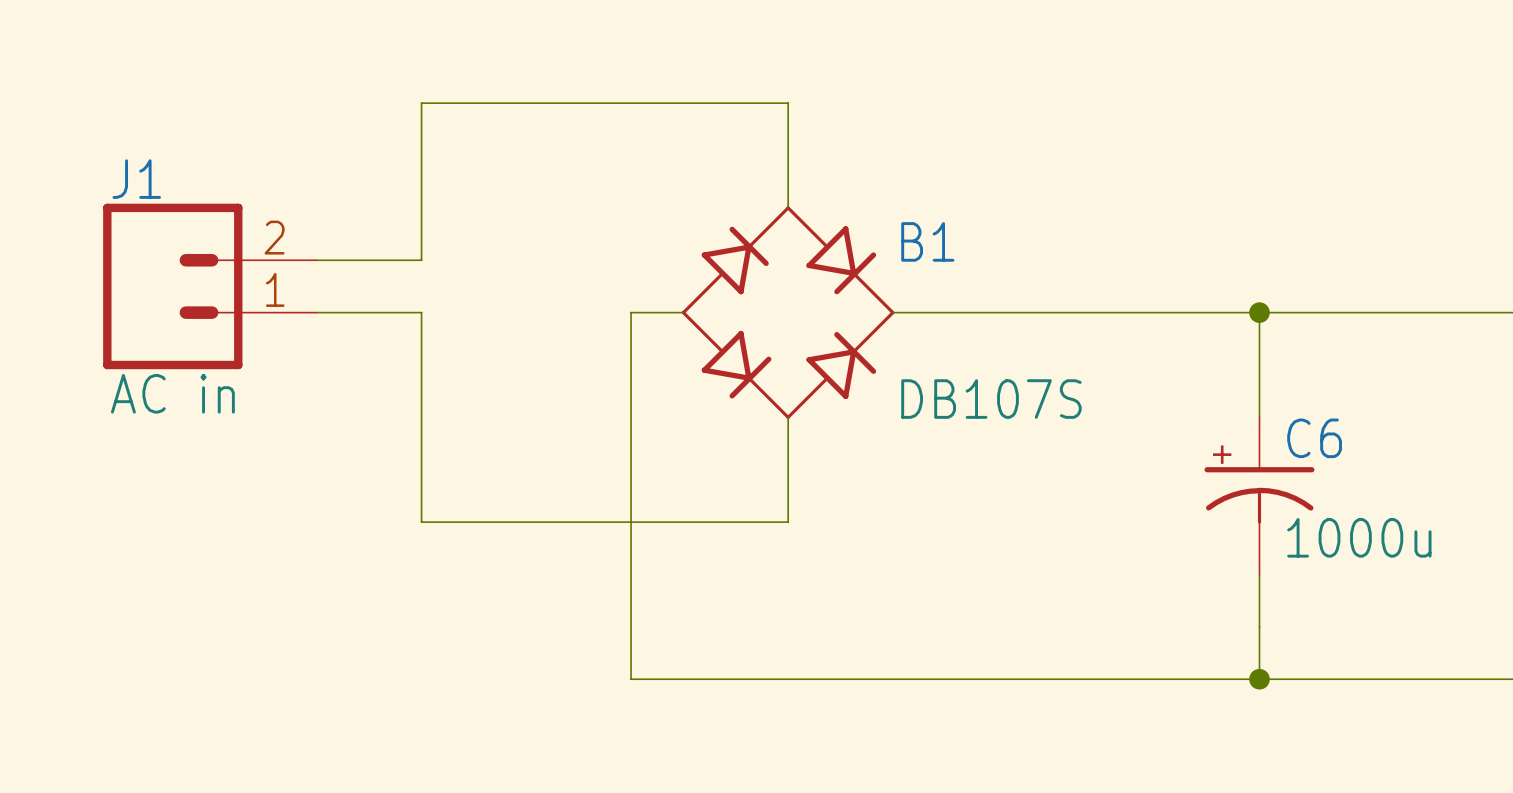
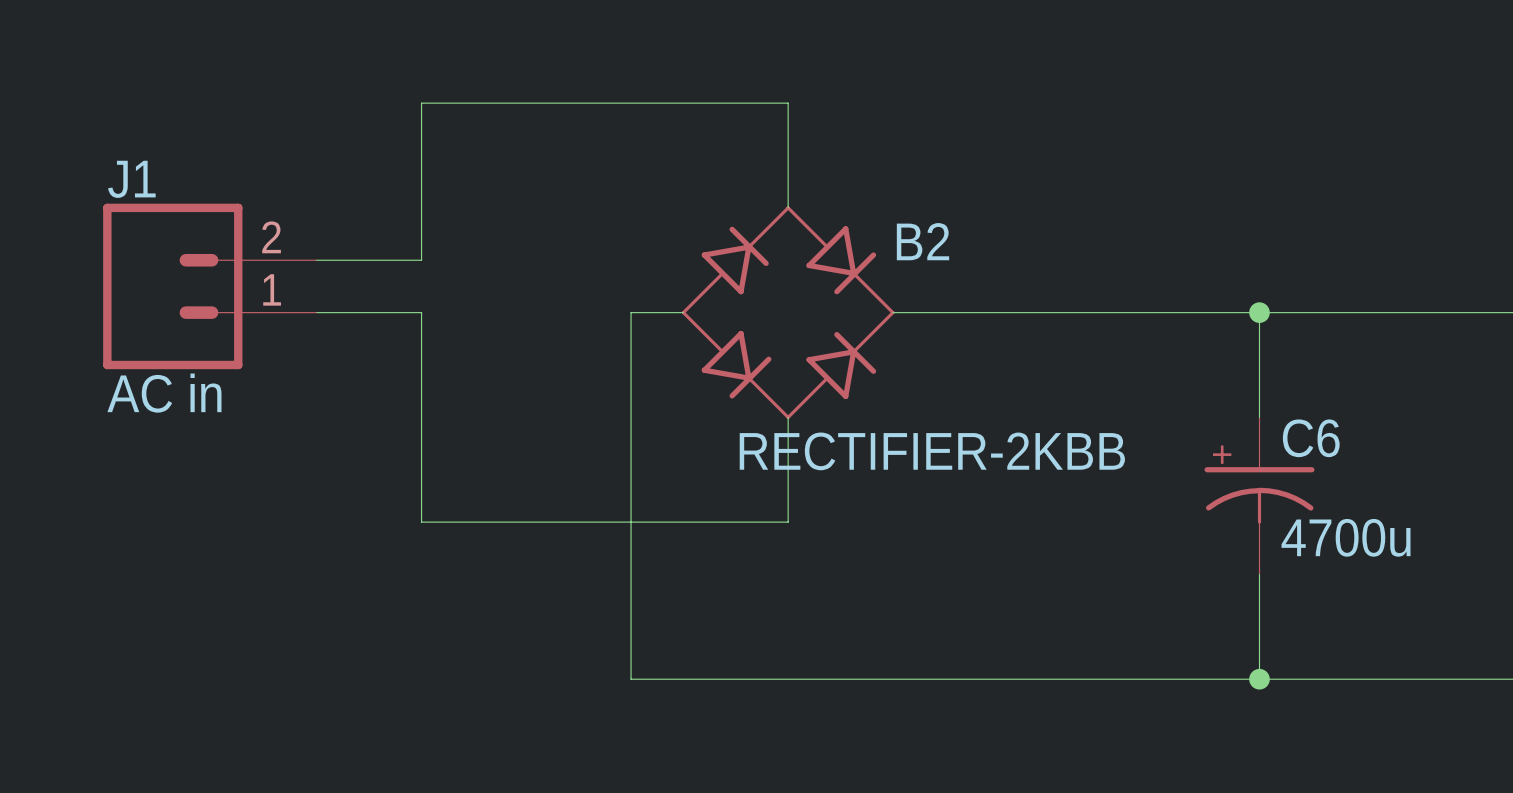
B1 name: B1 (927, 241) -> B2 (922, 241)
B1 value: DB107S (991, 399) -> RECTIFIER-2KBB (932, 451)
C6 value: 1000u (1359, 537) -> 4700u (1346, 537)

